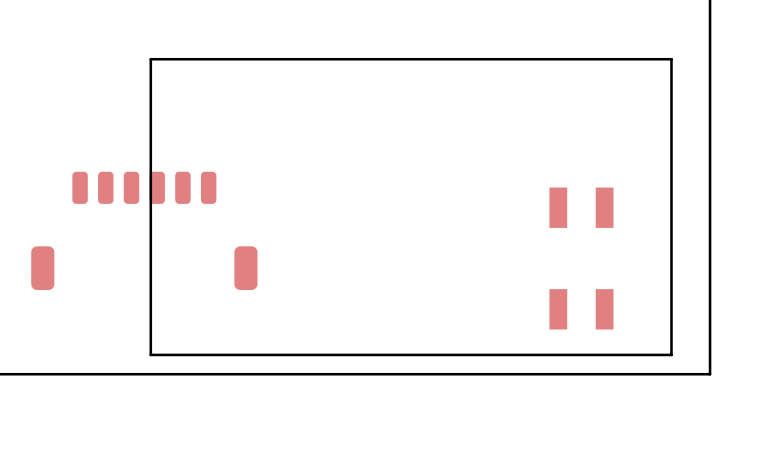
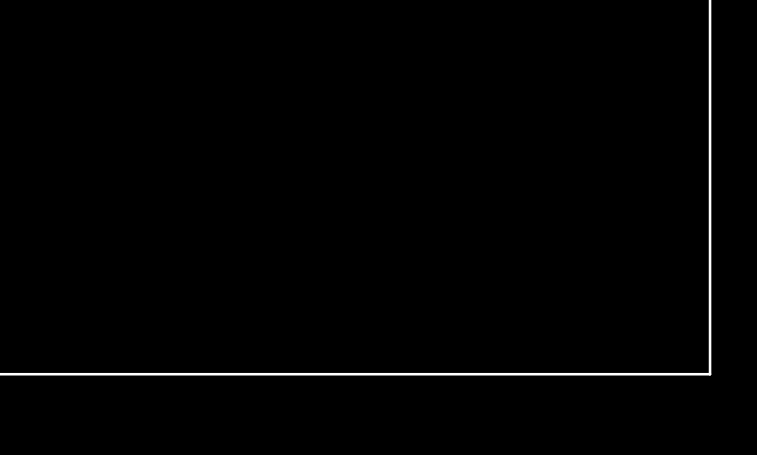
board edge: (671, 59) (150, 59) (150, 354) (671, 354) (671, 59) -> none
part: (144, 230) -> none
part: (581, 258) -> none

